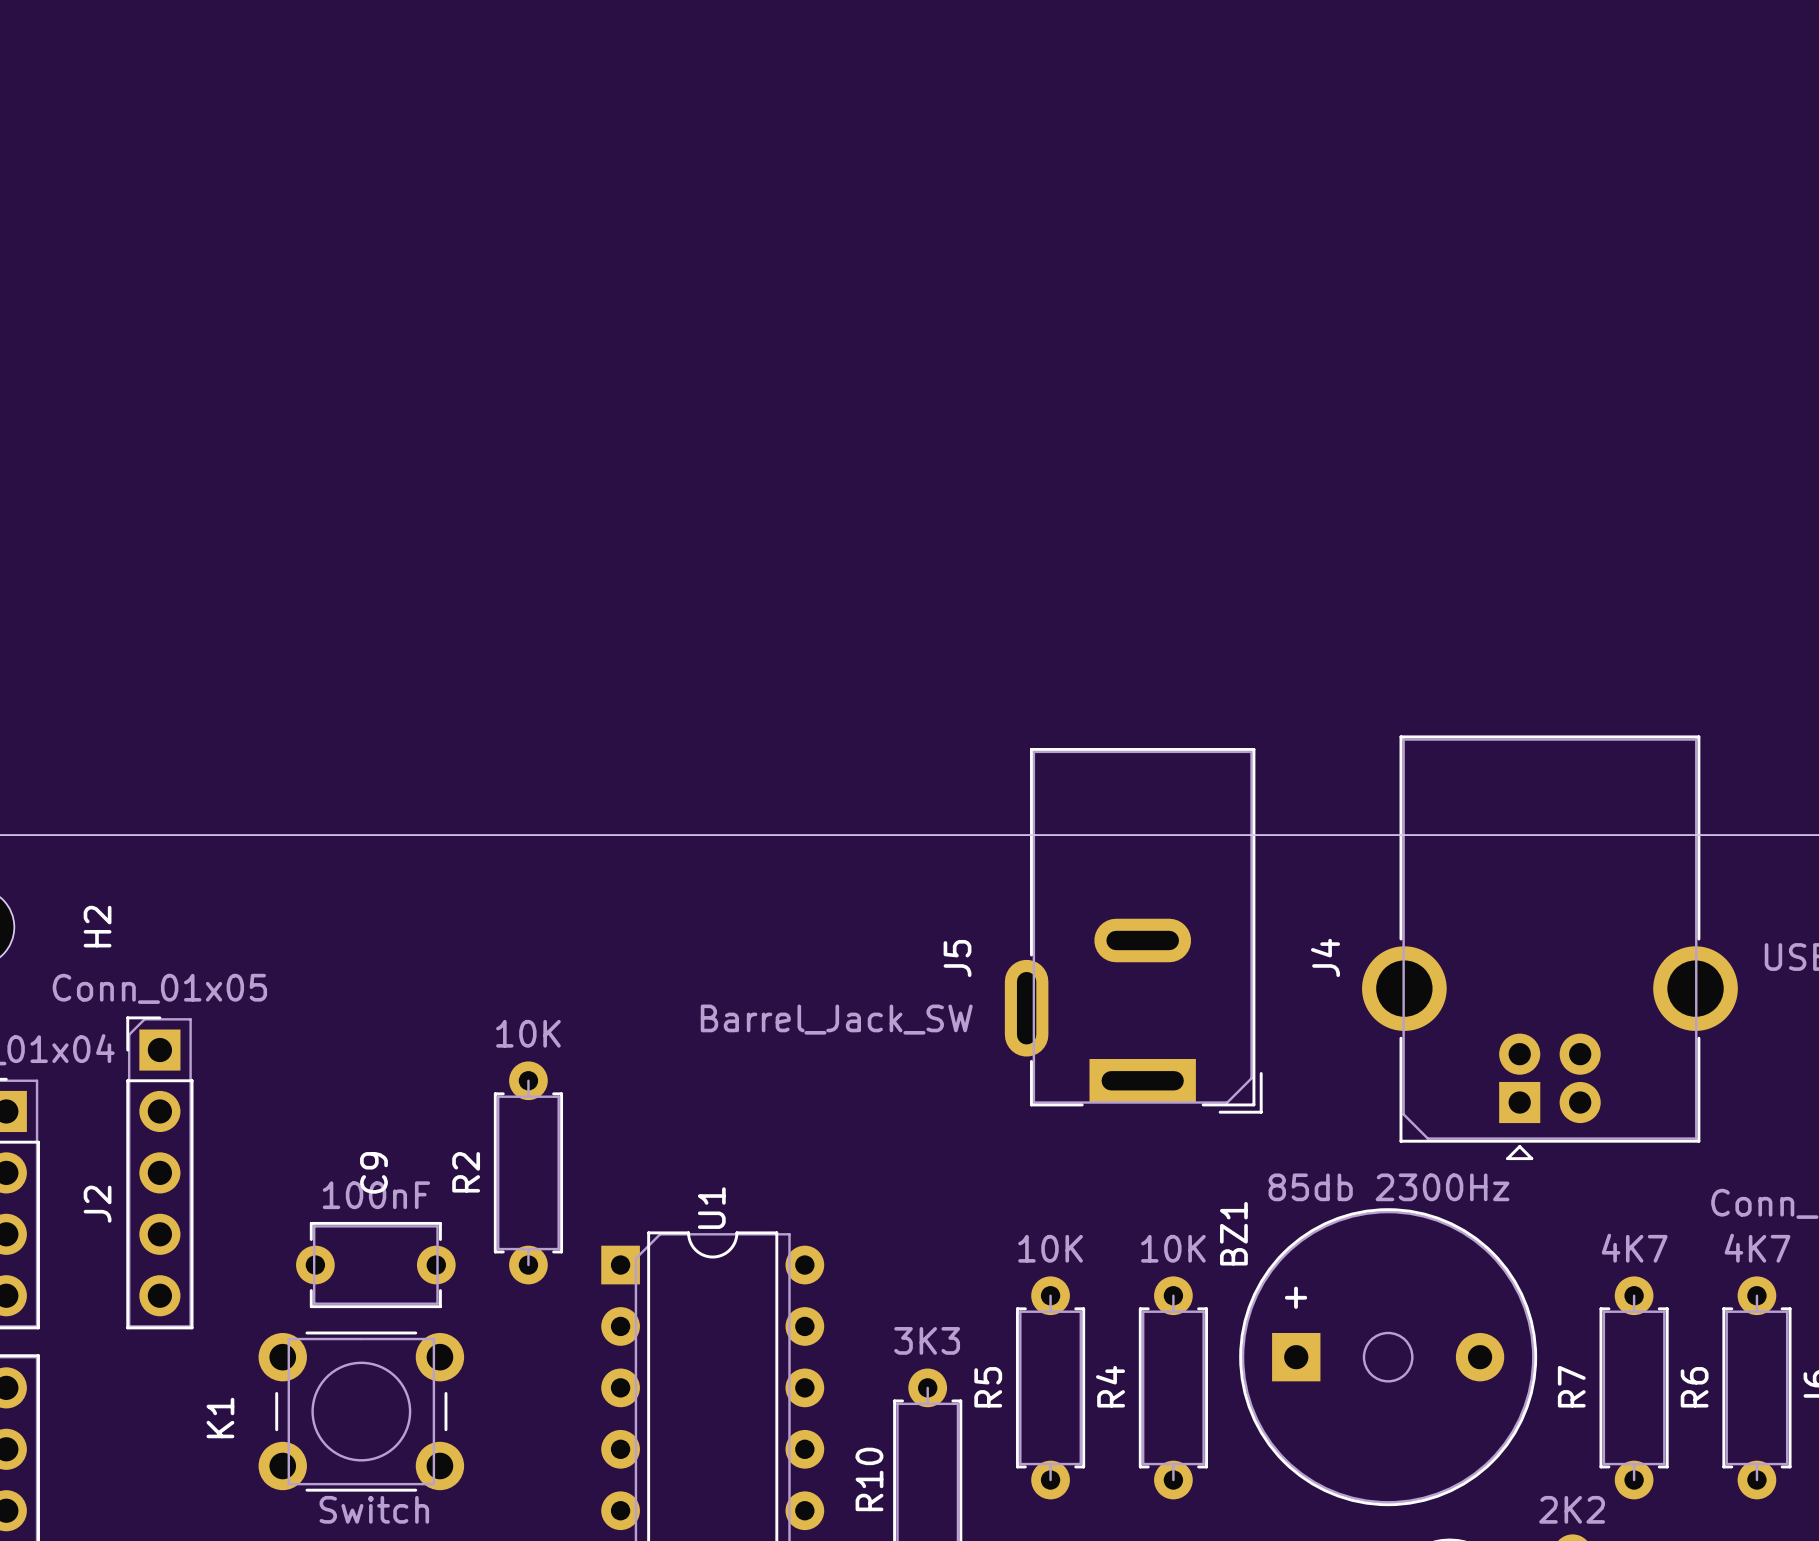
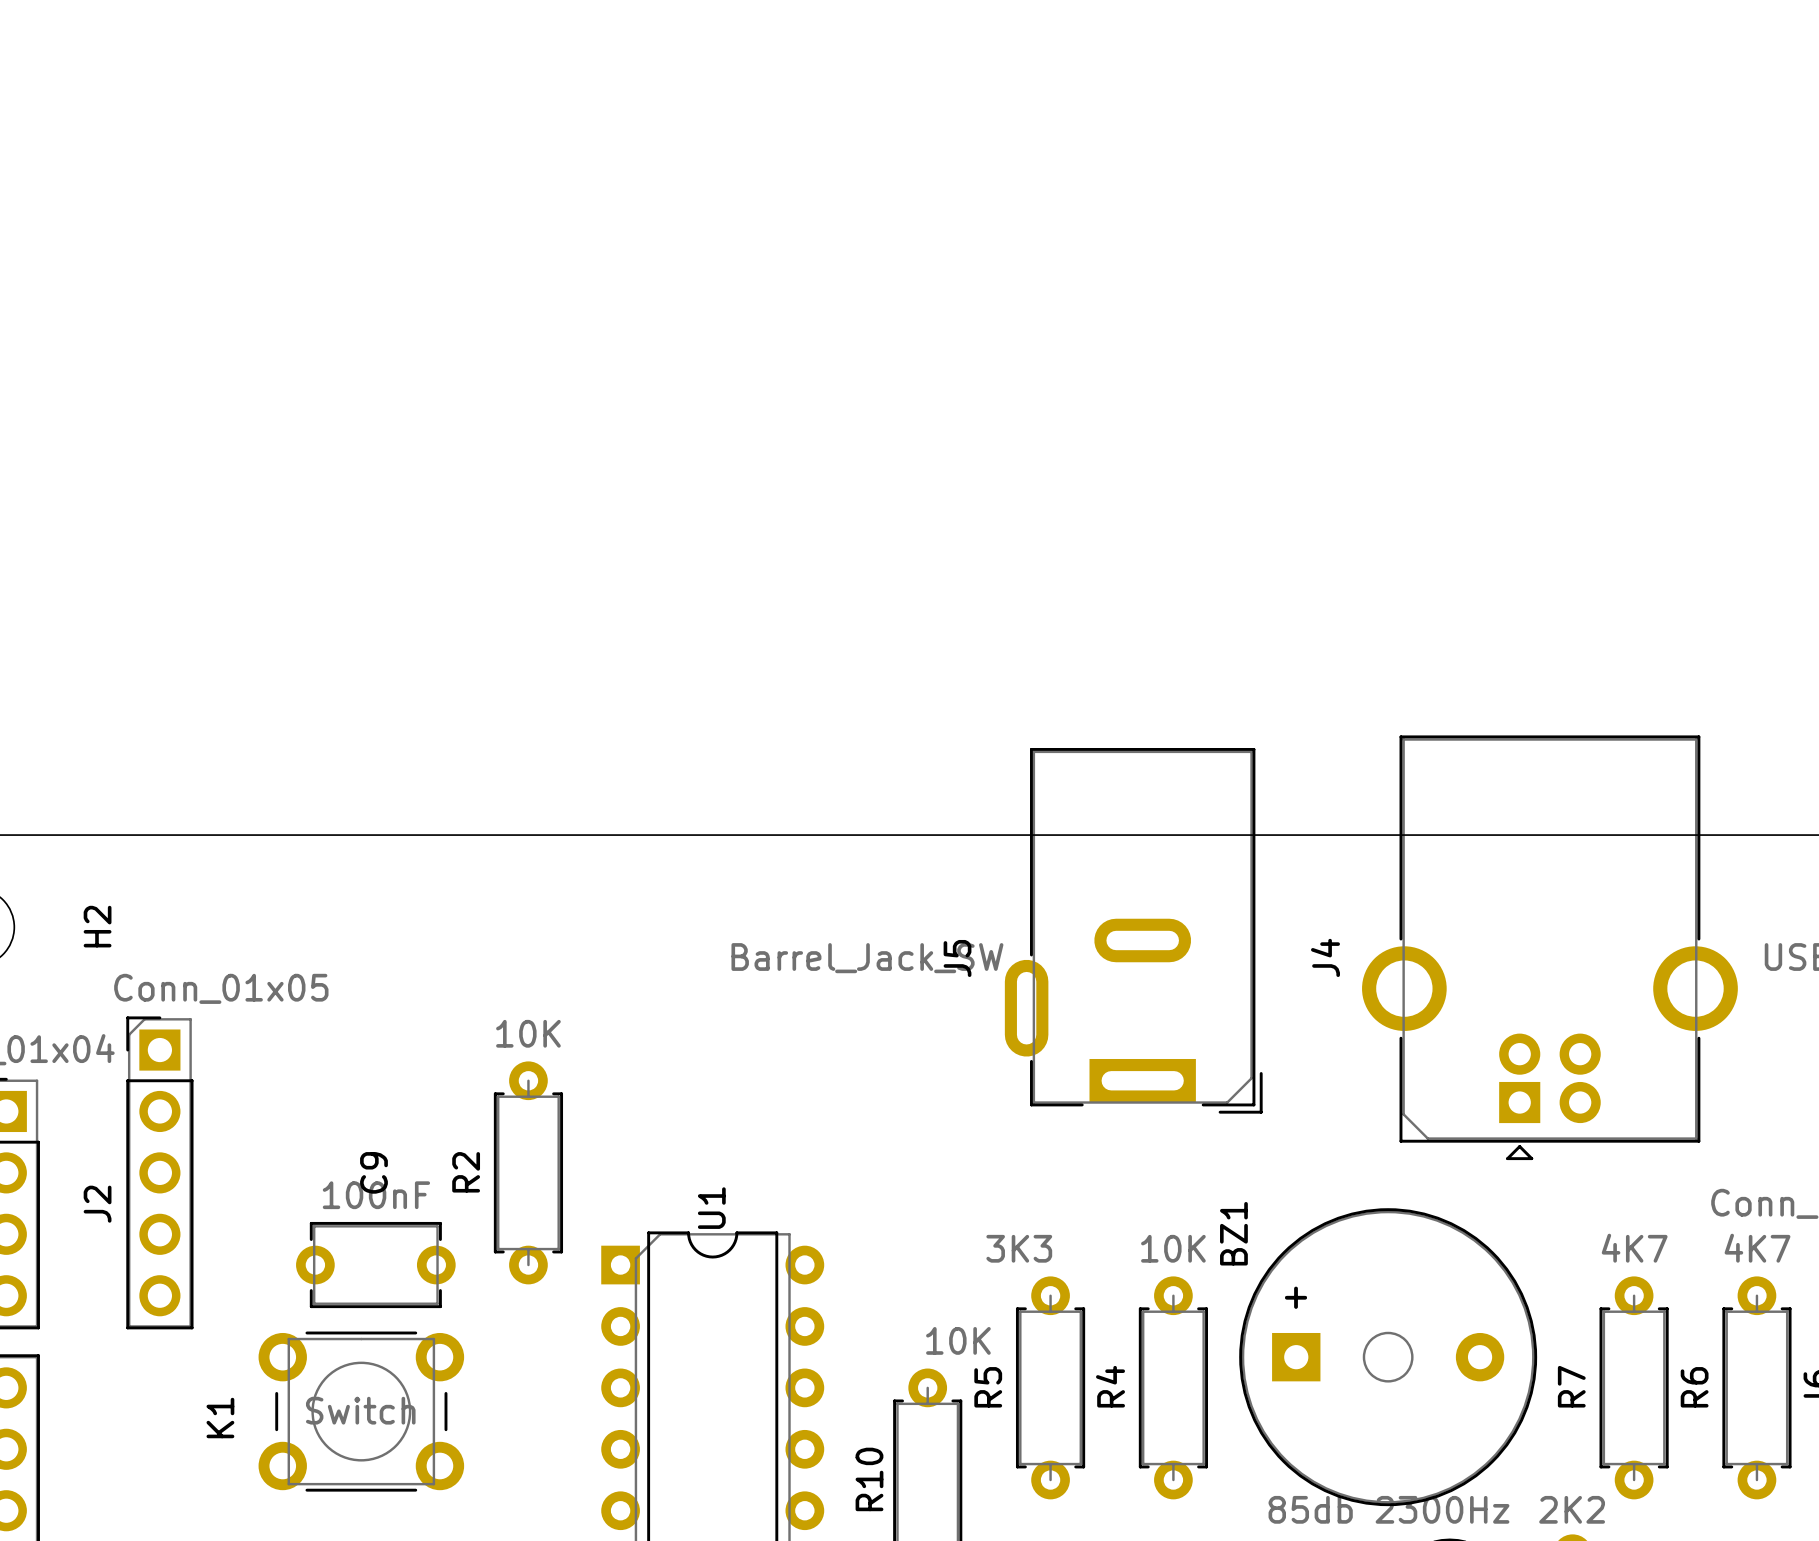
J2 value position: Conn_01x05 (159, 988) -> Conn_01x05 (221, 988)
J5 value position: Barrel_Jack_SW (836, 1019) -> Barrel_Jack_SW (867, 958)
BZ1 value position: 85db 2300Hz (1388, 1187) -> 85db 2300Hz (1388, 1509)
R5 value position: 10K (1050, 1248) -> 10K (958, 1340)
R10 value position: 3K3 (927, 1340) -> 3K3 (1019, 1248)
K1 value position: Switch (374, 1509) -> Switch (360, 1410)

